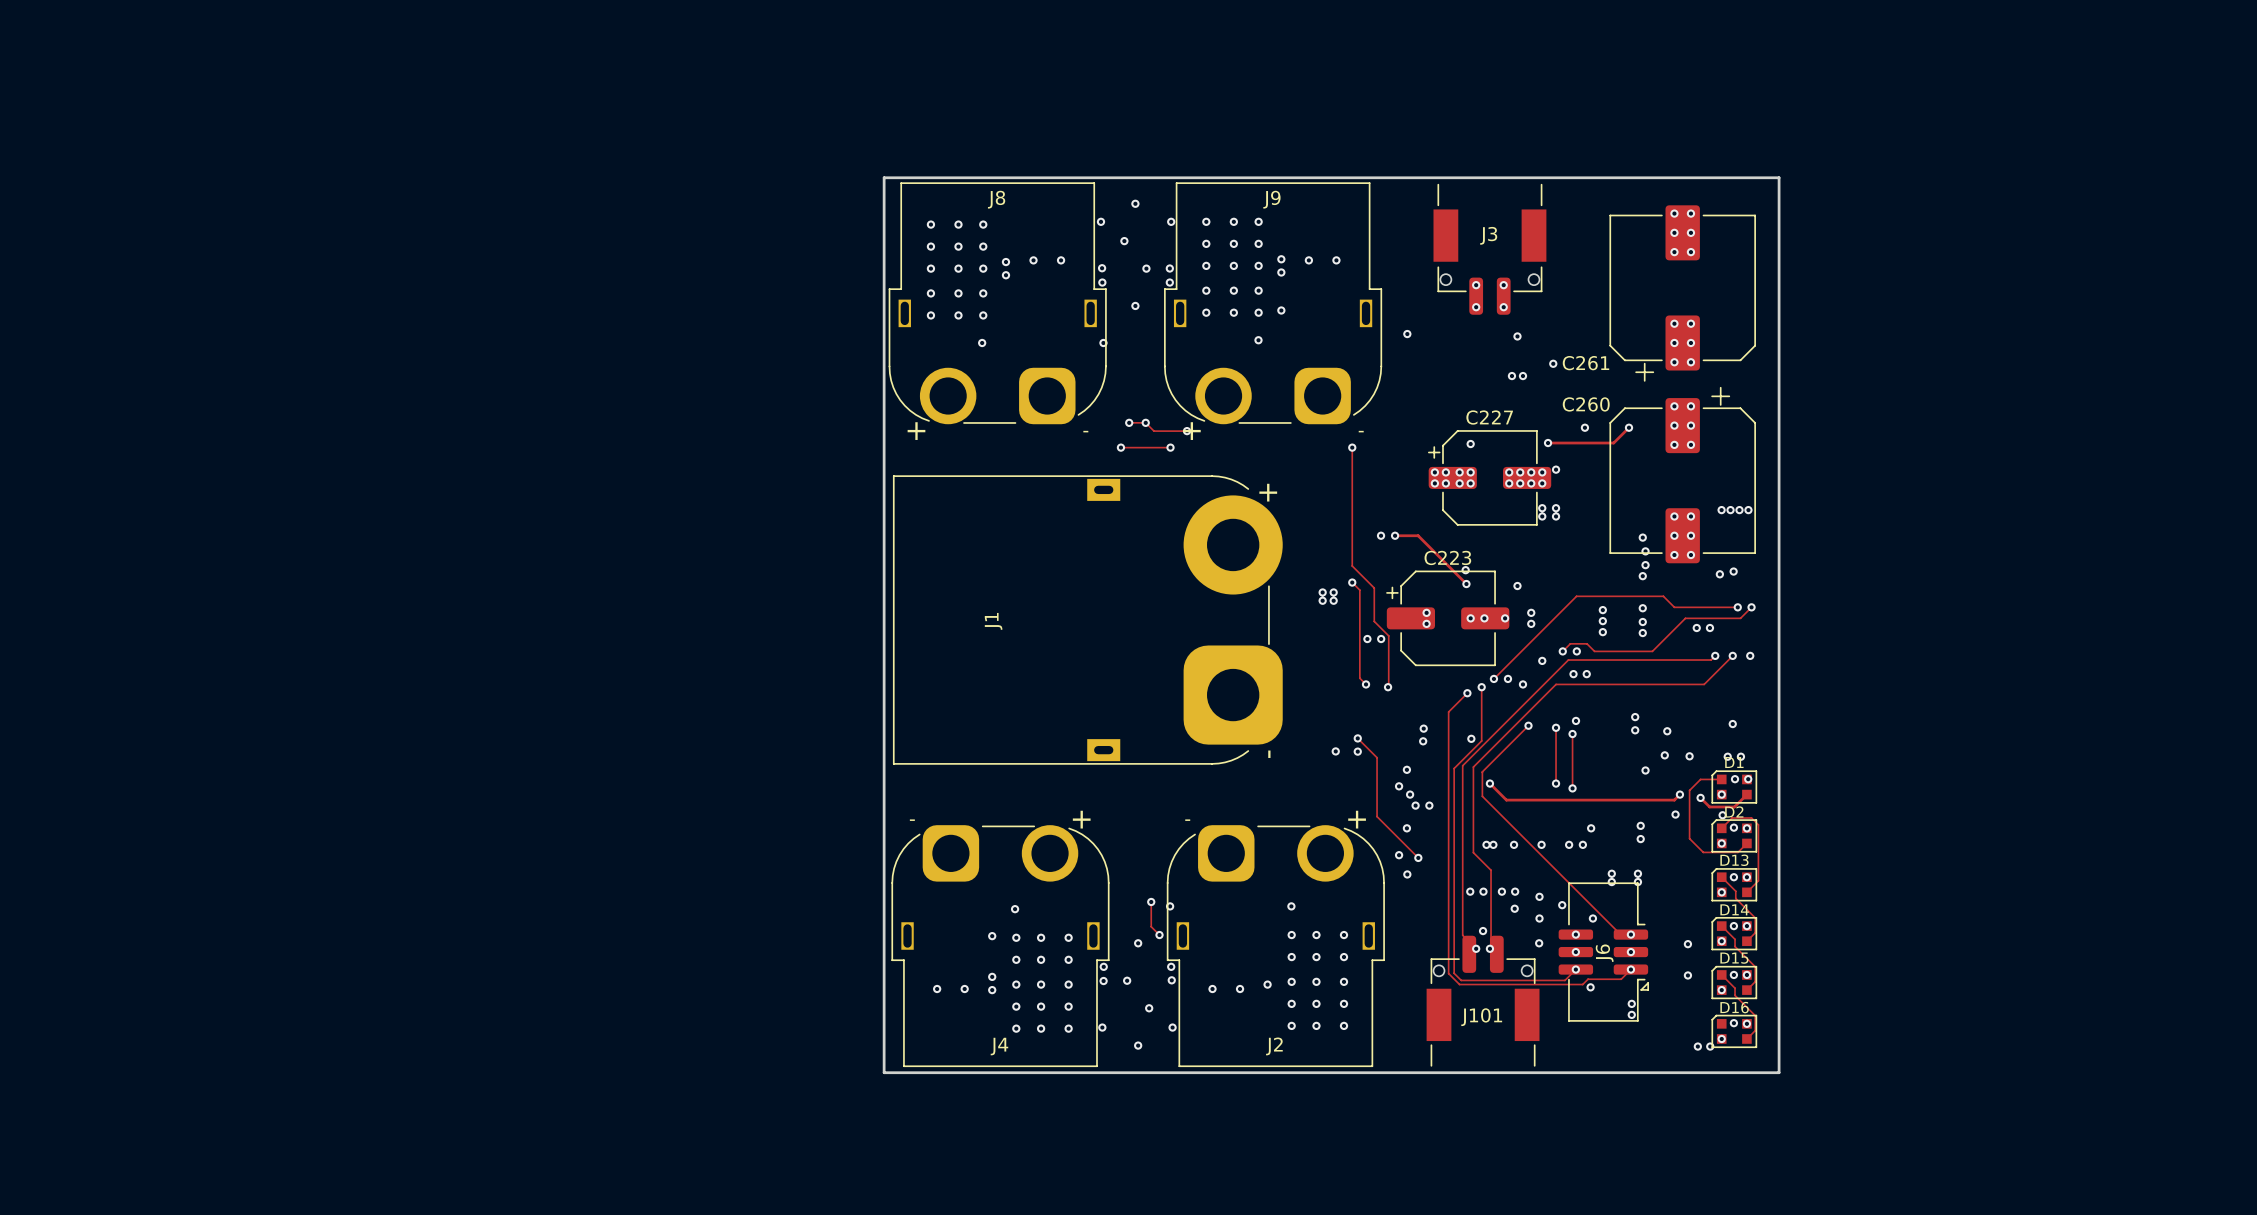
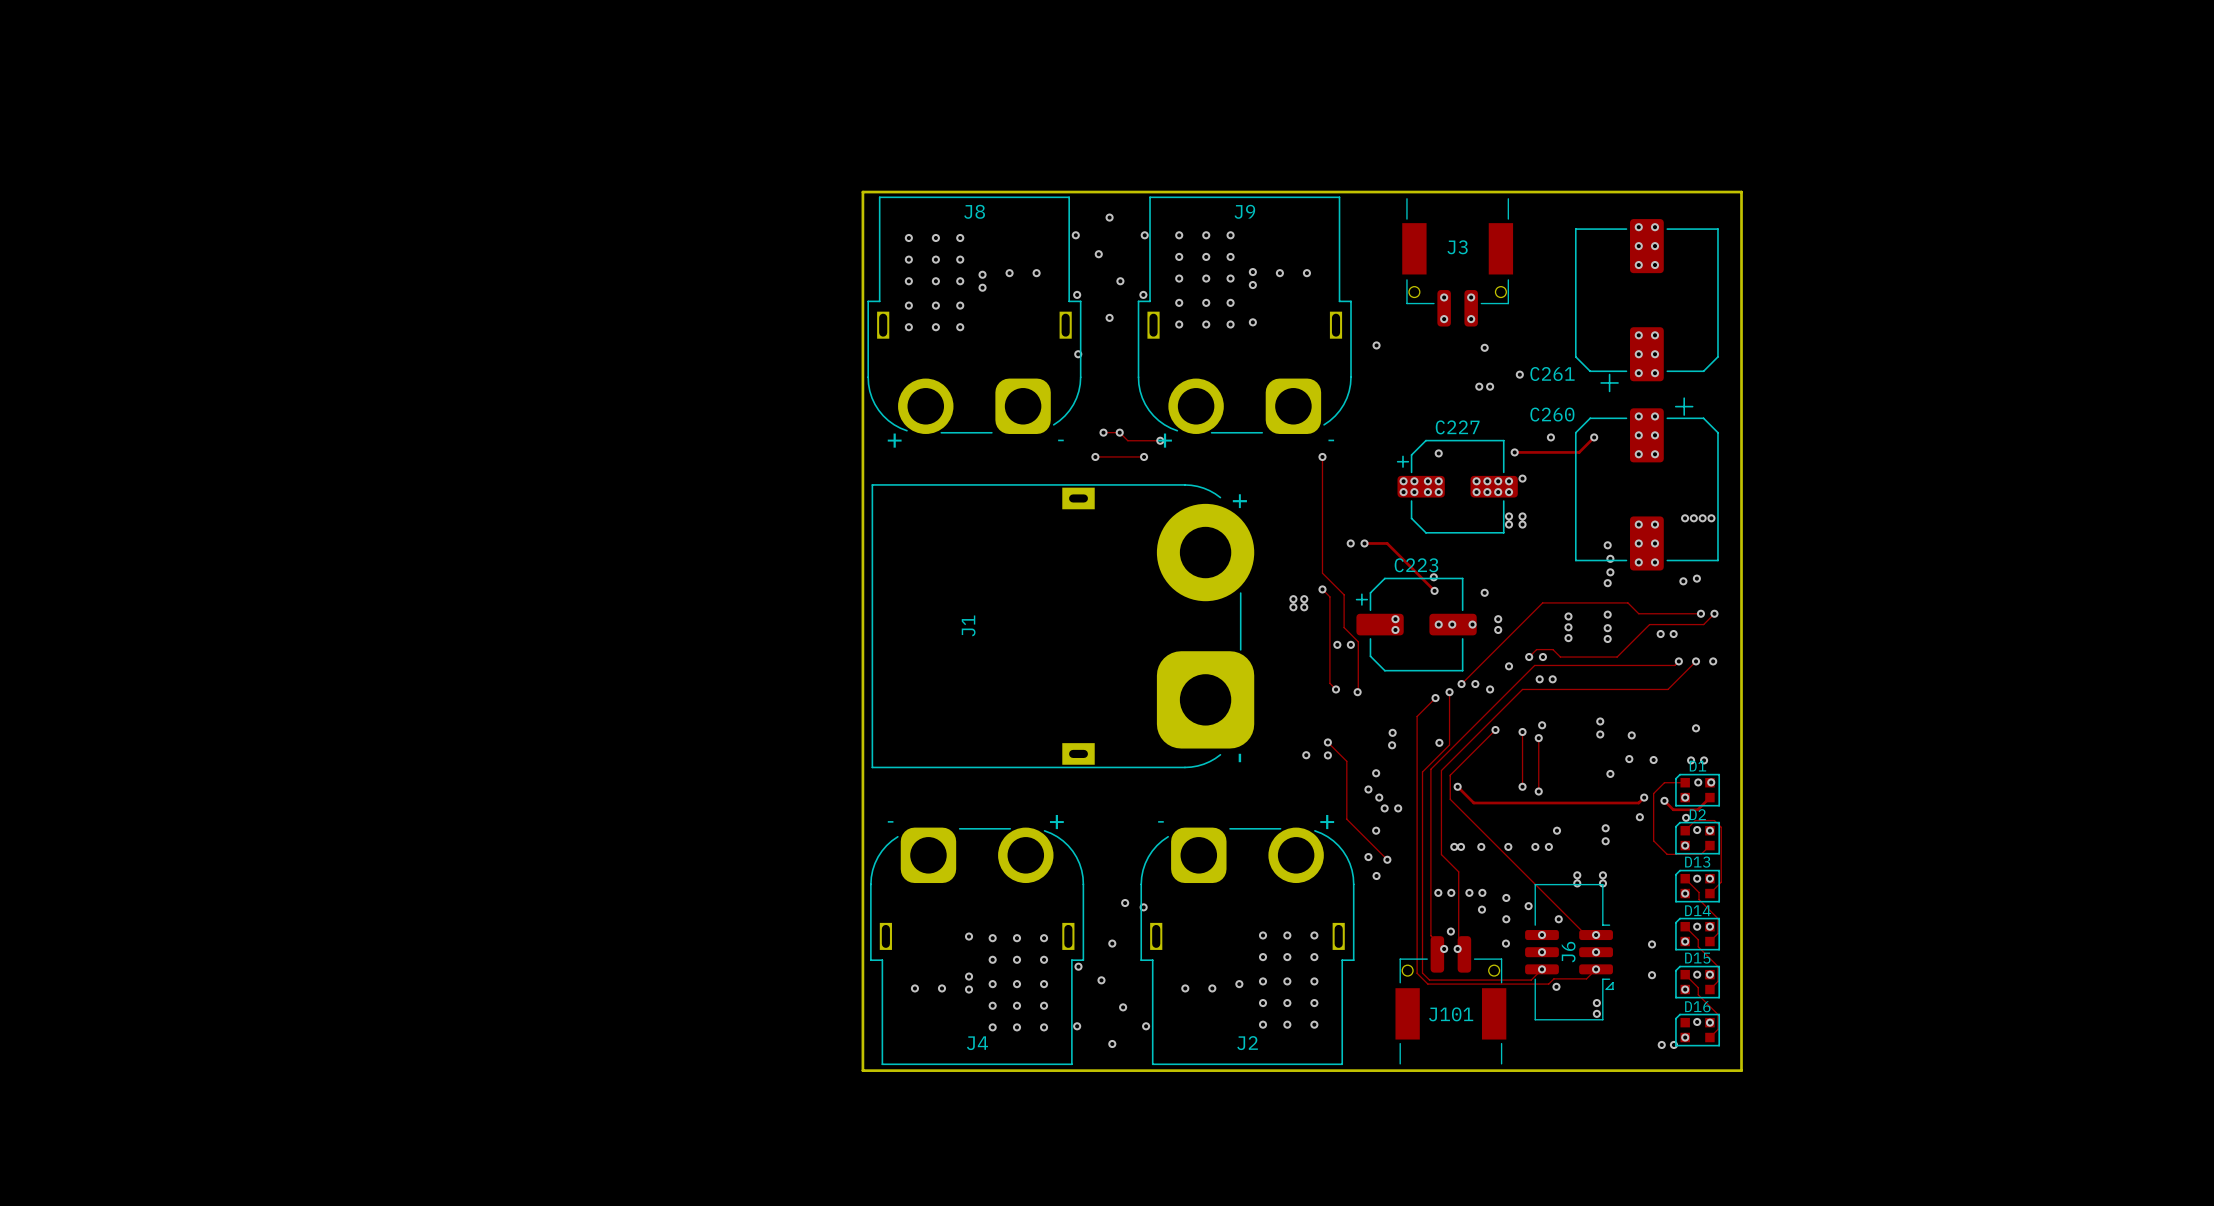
via: (1102, 268) -> none
via: (1169, 268) -> none
via: (1258, 340) -> none
via: (982, 342) -> none
track: (1151, 901) (1151, 926) (1159, 935) -> none
via: (1291, 906) -> none
via: (1015, 909) -> none
via: (1159, 935) -> none
via: (1171, 966) -> none
via: (1171, 980) -> none
via: (1103, 981) -> none

